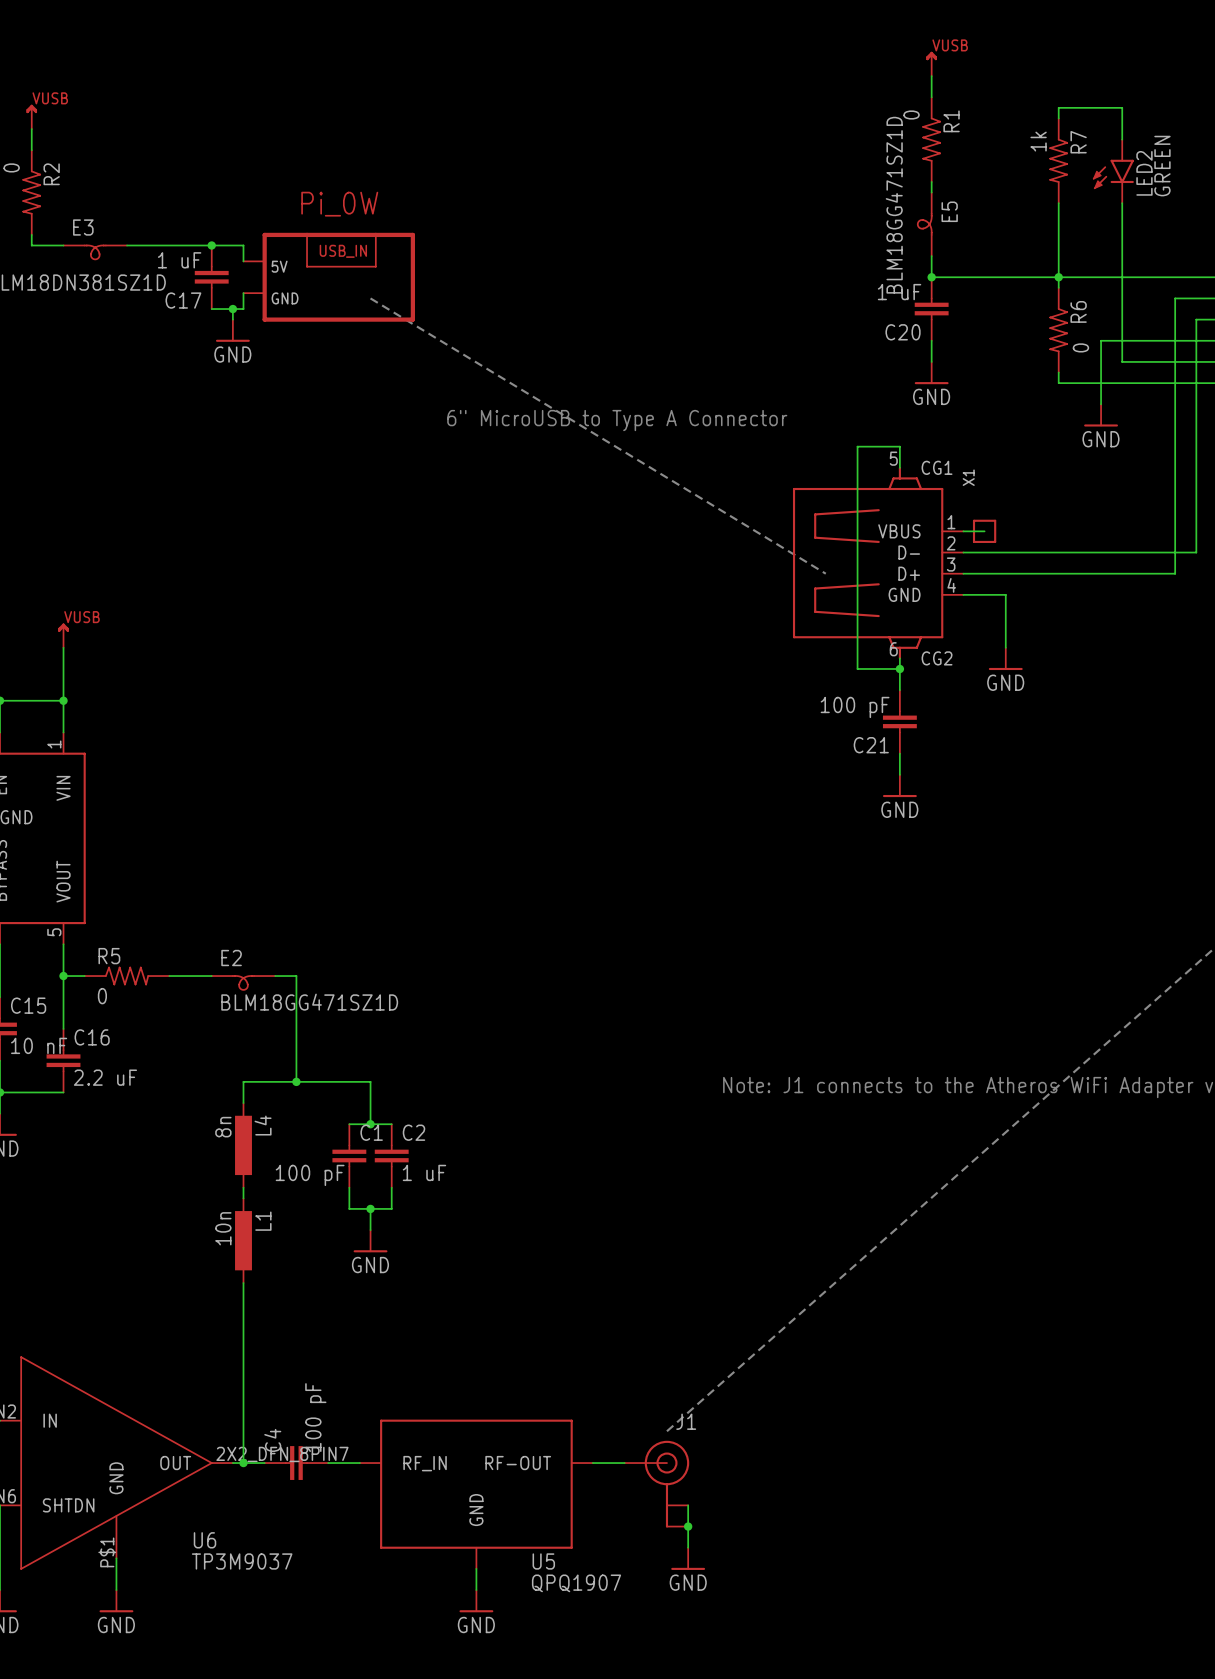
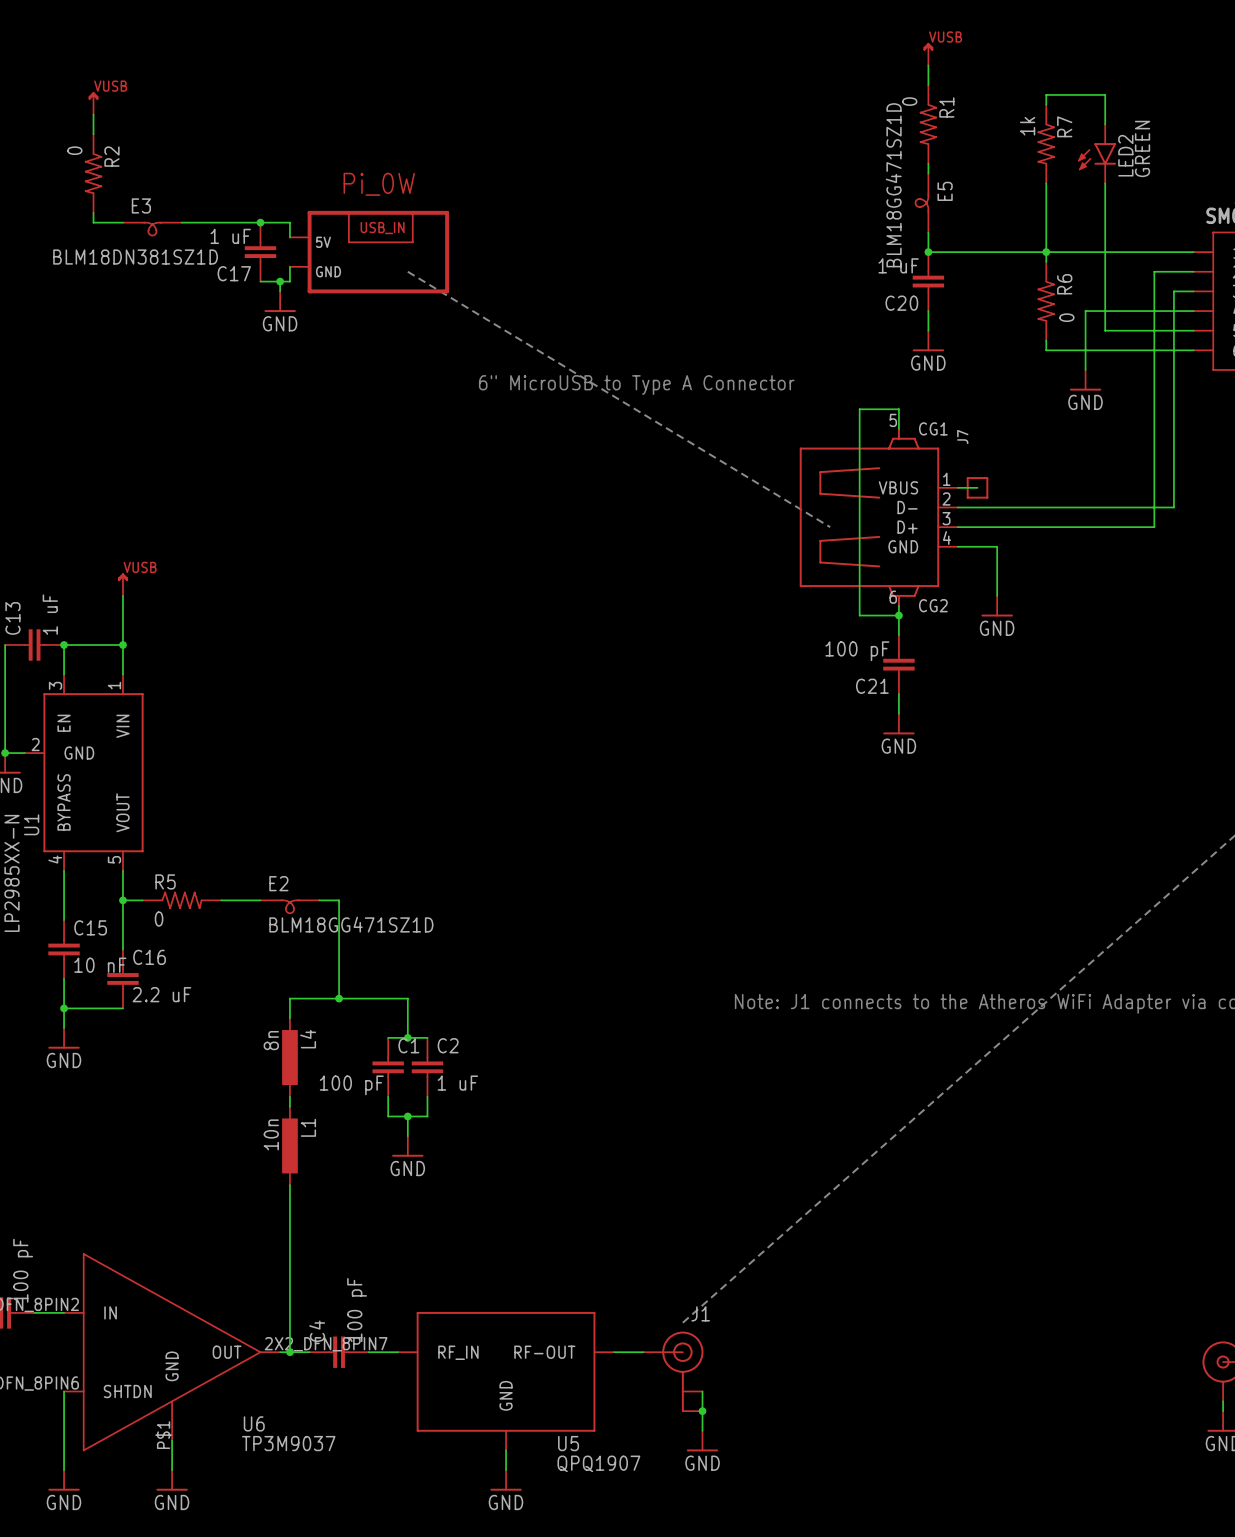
X1 name: X1 (968, 477) -> J7 (962, 437)

